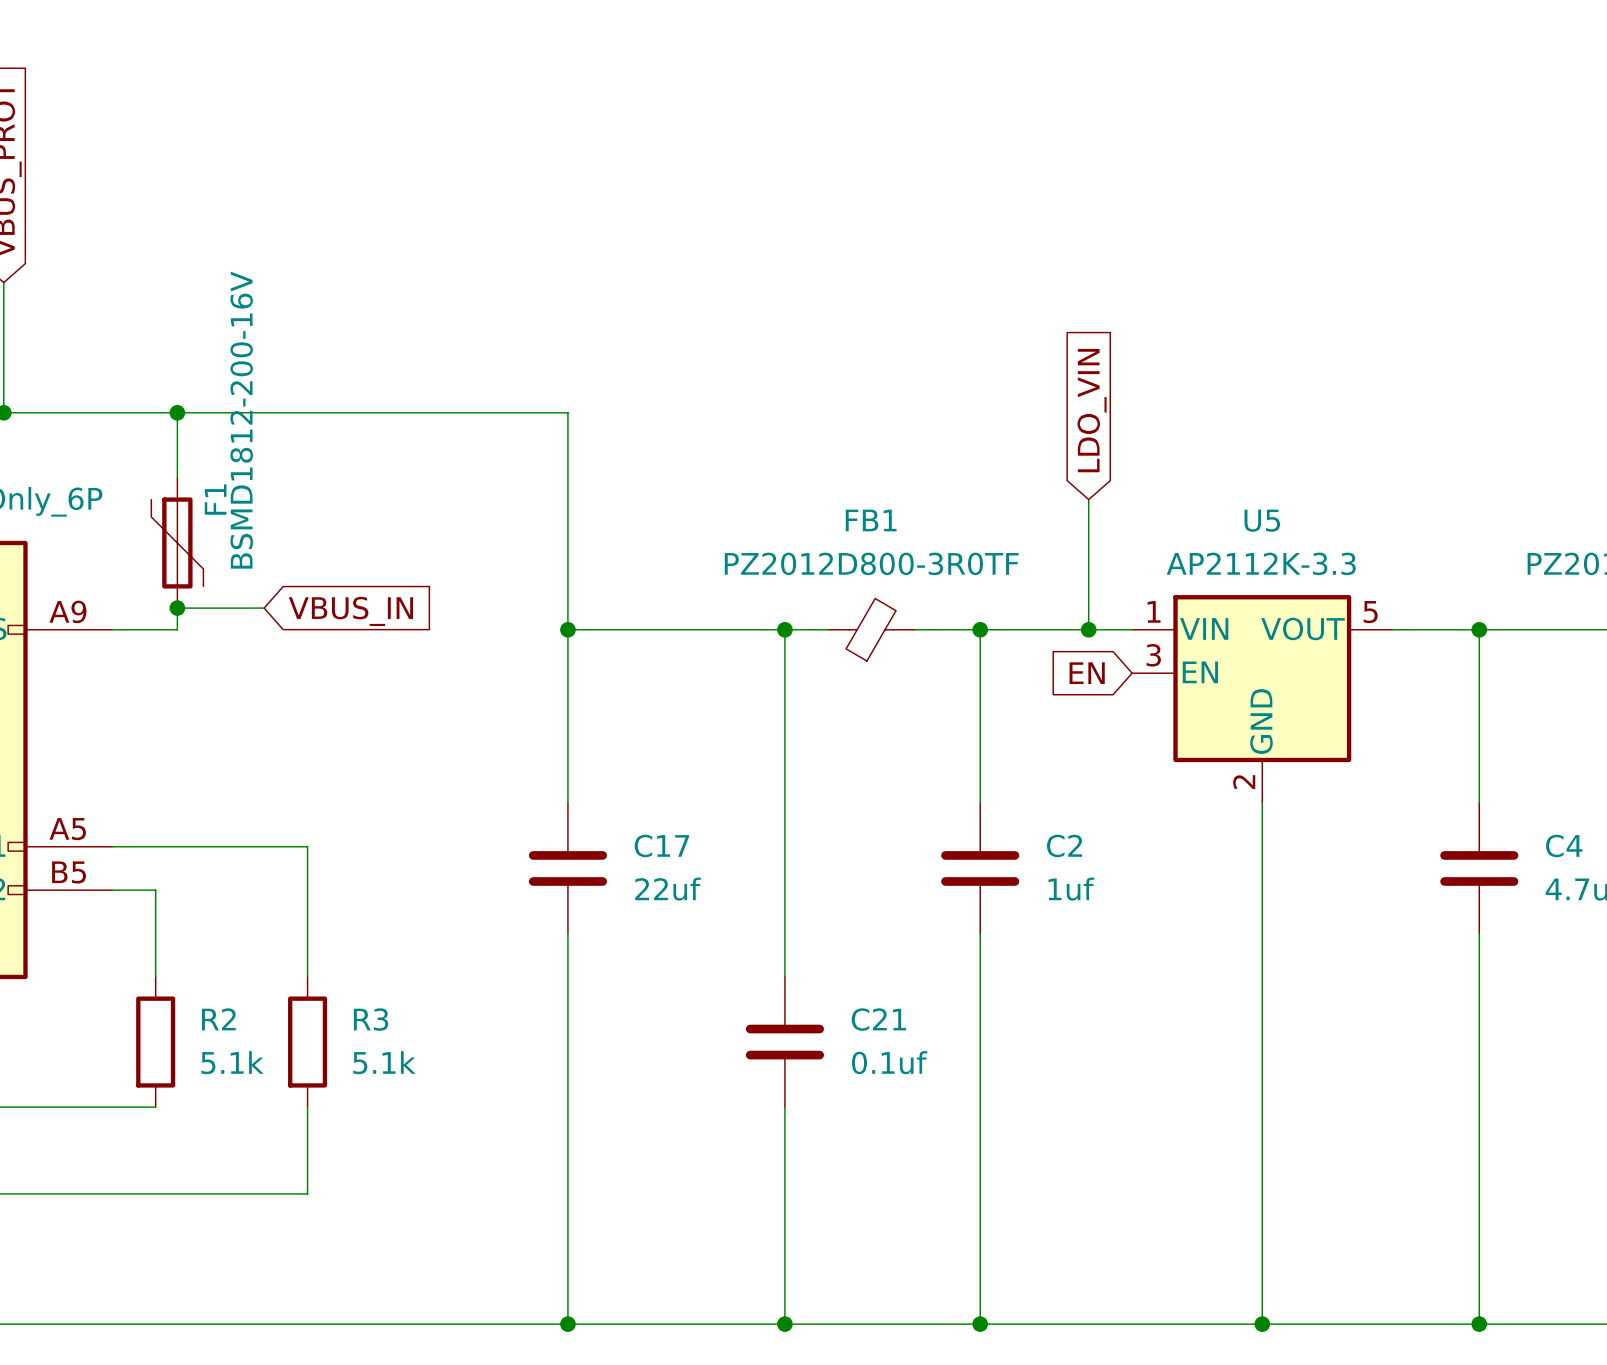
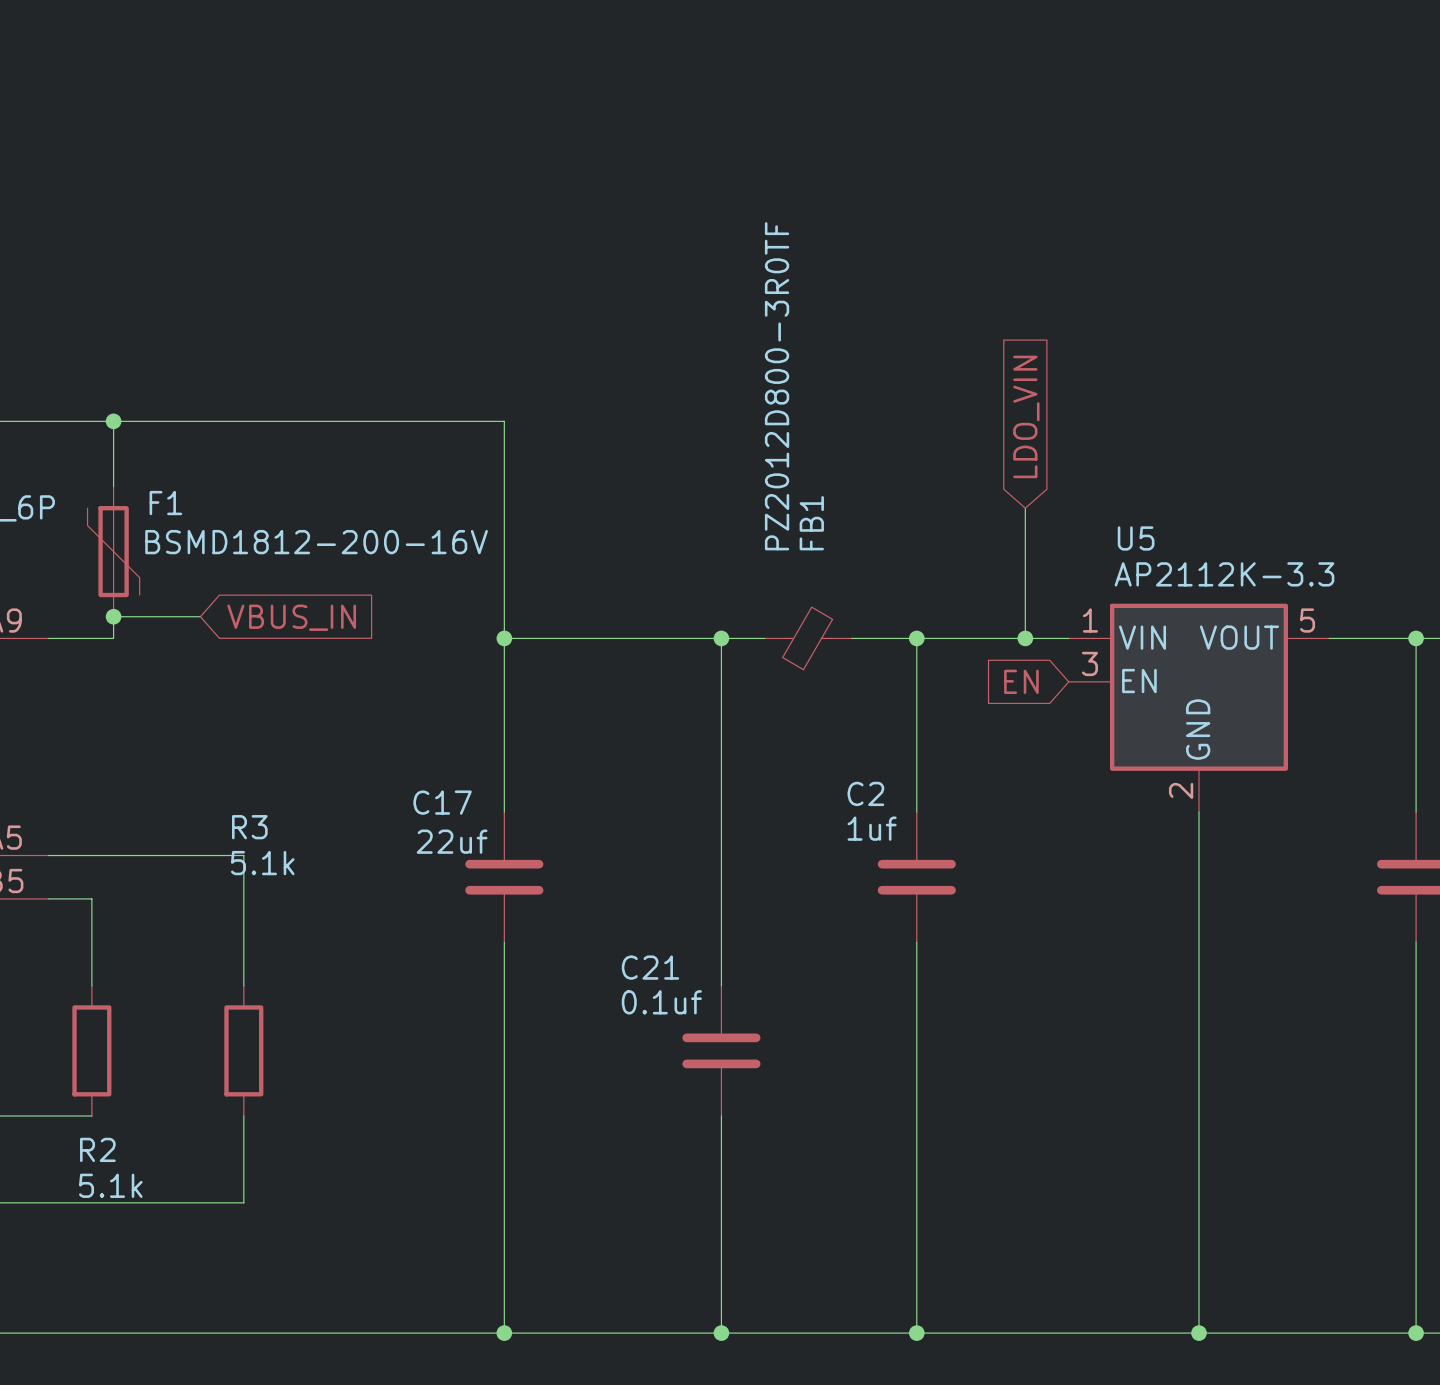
F1 value rotation: 0° (241, 420) -> 90° clockwise (316, 542)
F1 name rotation: 0° (215, 499) -> 90° clockwise (165, 503)
FB1 name rotation: 0° (871, 520) -> 90° counterclockwise (811, 523)
U5 name position: U5 (1262, 520) -> U5 (1136, 538)
FB1 value rotation: 0° (871, 563) -> 90° counterclockwise (777, 386)
U5 value position: AP2112K-3.3 (1261, 563) -> AP2112K-3.3 (1224, 574)
C17 name position: C17 (661, 845) -> C17 (442, 802)
C2 name position: C2 (1064, 845) -> C2 (865, 793)
C17 value position: 22uf (668, 889) -> 22uf (452, 841)
C2 value position: 1uf (1071, 889) -> 1uf (872, 828)
R2 name position: R2 (218, 1019) -> R2 (97, 1149)
R3 name position: R3 (371, 1019) -> R3 (249, 827)
C21 name position: C21 (878, 1019) -> C21 (650, 967)
R2 value position: 5.1k (232, 1062) -> 5.1k (110, 1185)
R3 value position: 5.1k (384, 1062) -> 5.1k (262, 863)
C21 value position: 0.1uf (889, 1062) -> 0.1uf (661, 1002)

